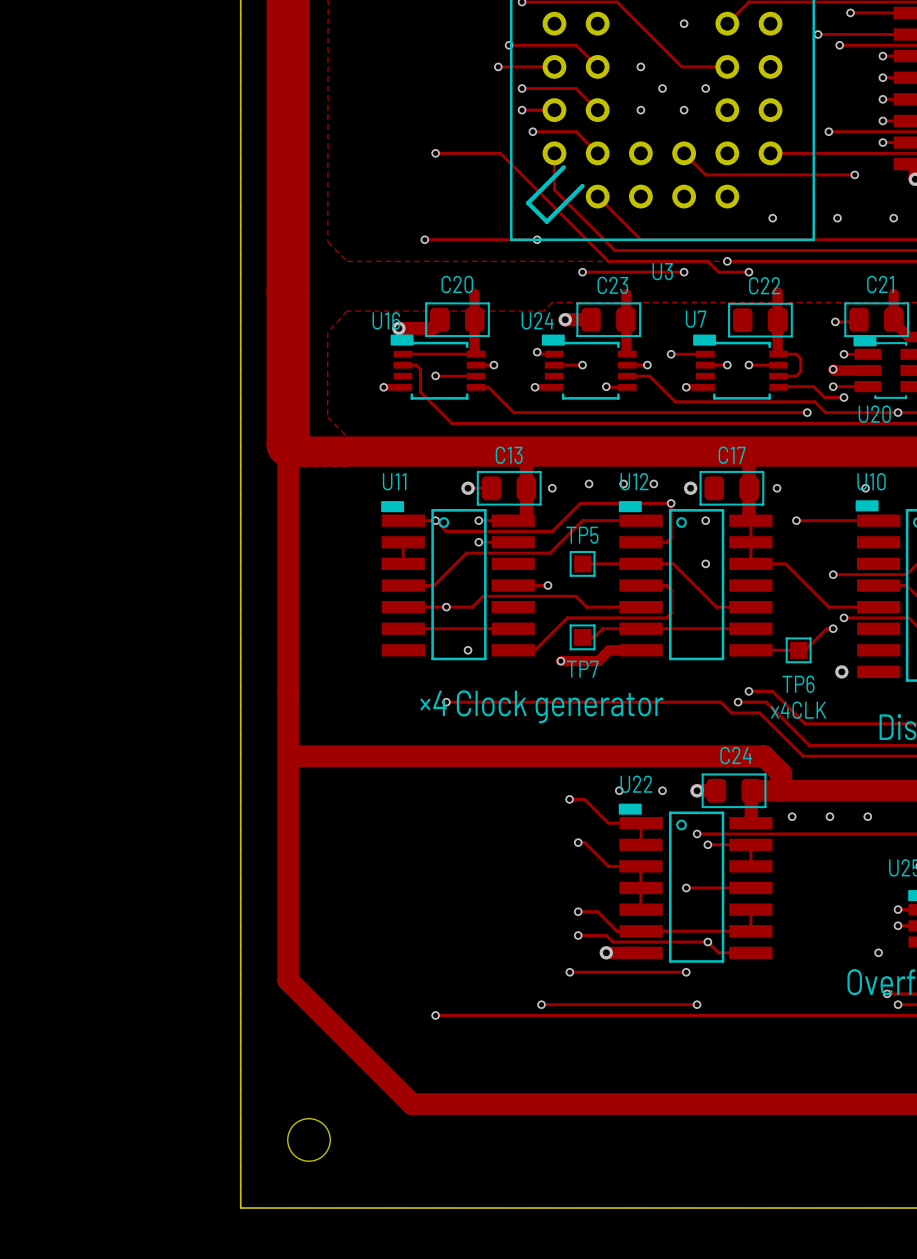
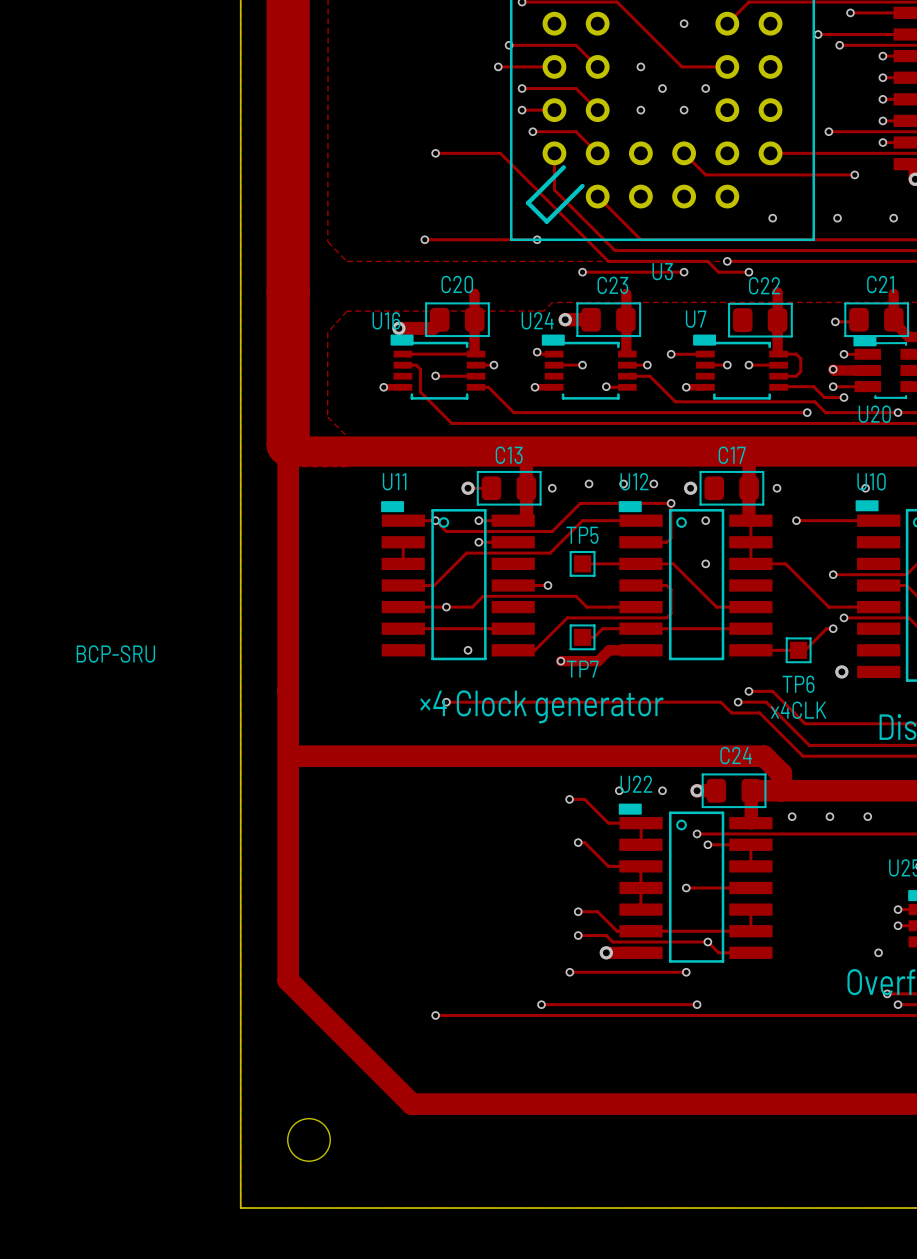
text: none -> BCP-SRU (115, 654)

